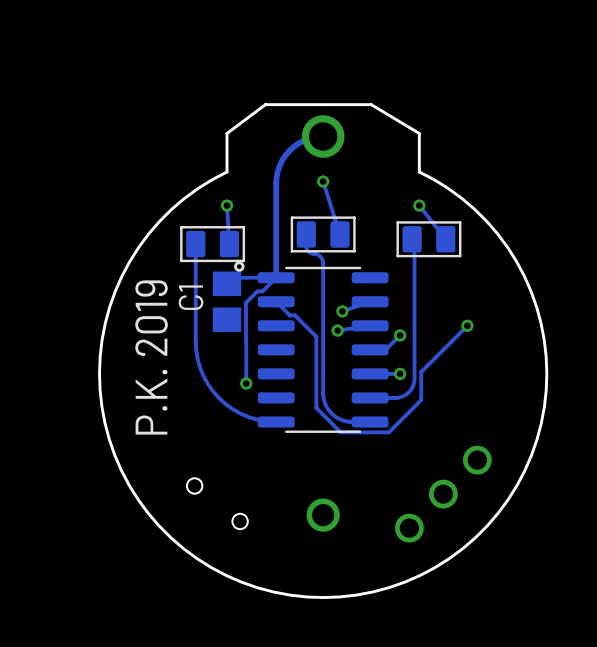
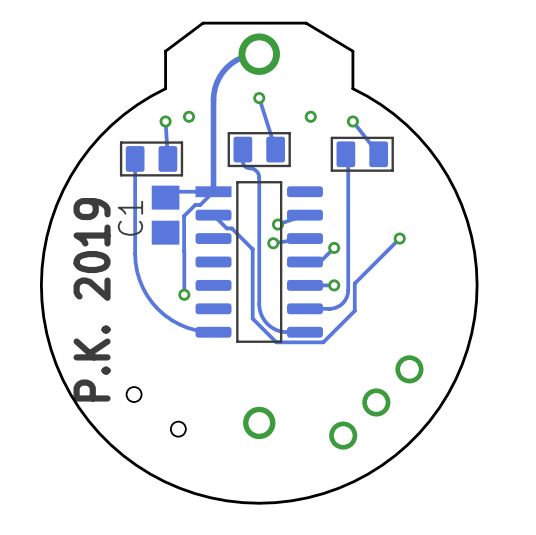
via: none -> (188, 116)
via: none -> (310, 116)
part footprint: [234, 261, 389, 433] -> [195, 181, 323, 343]

